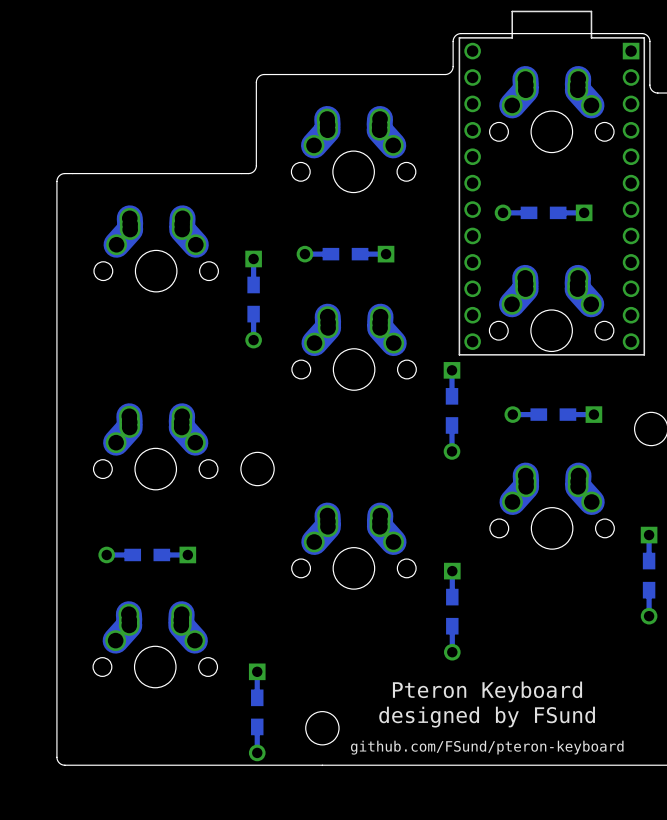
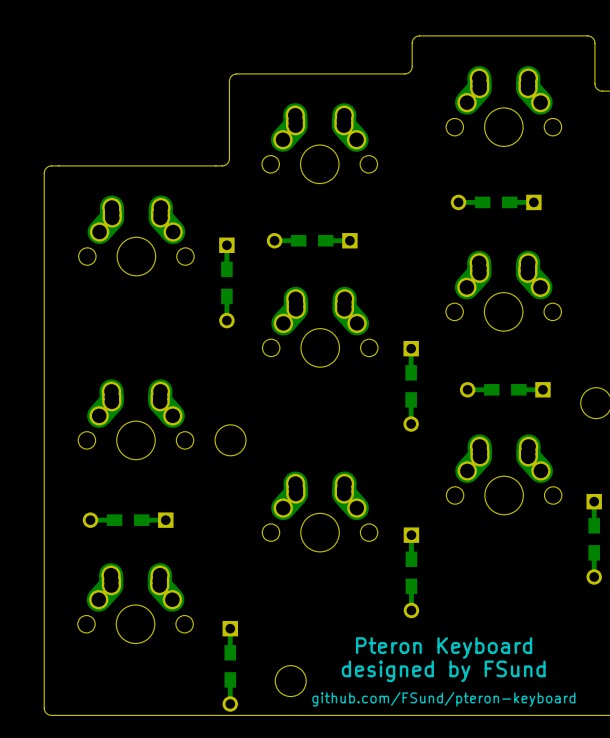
part: (551, 183) -> none

